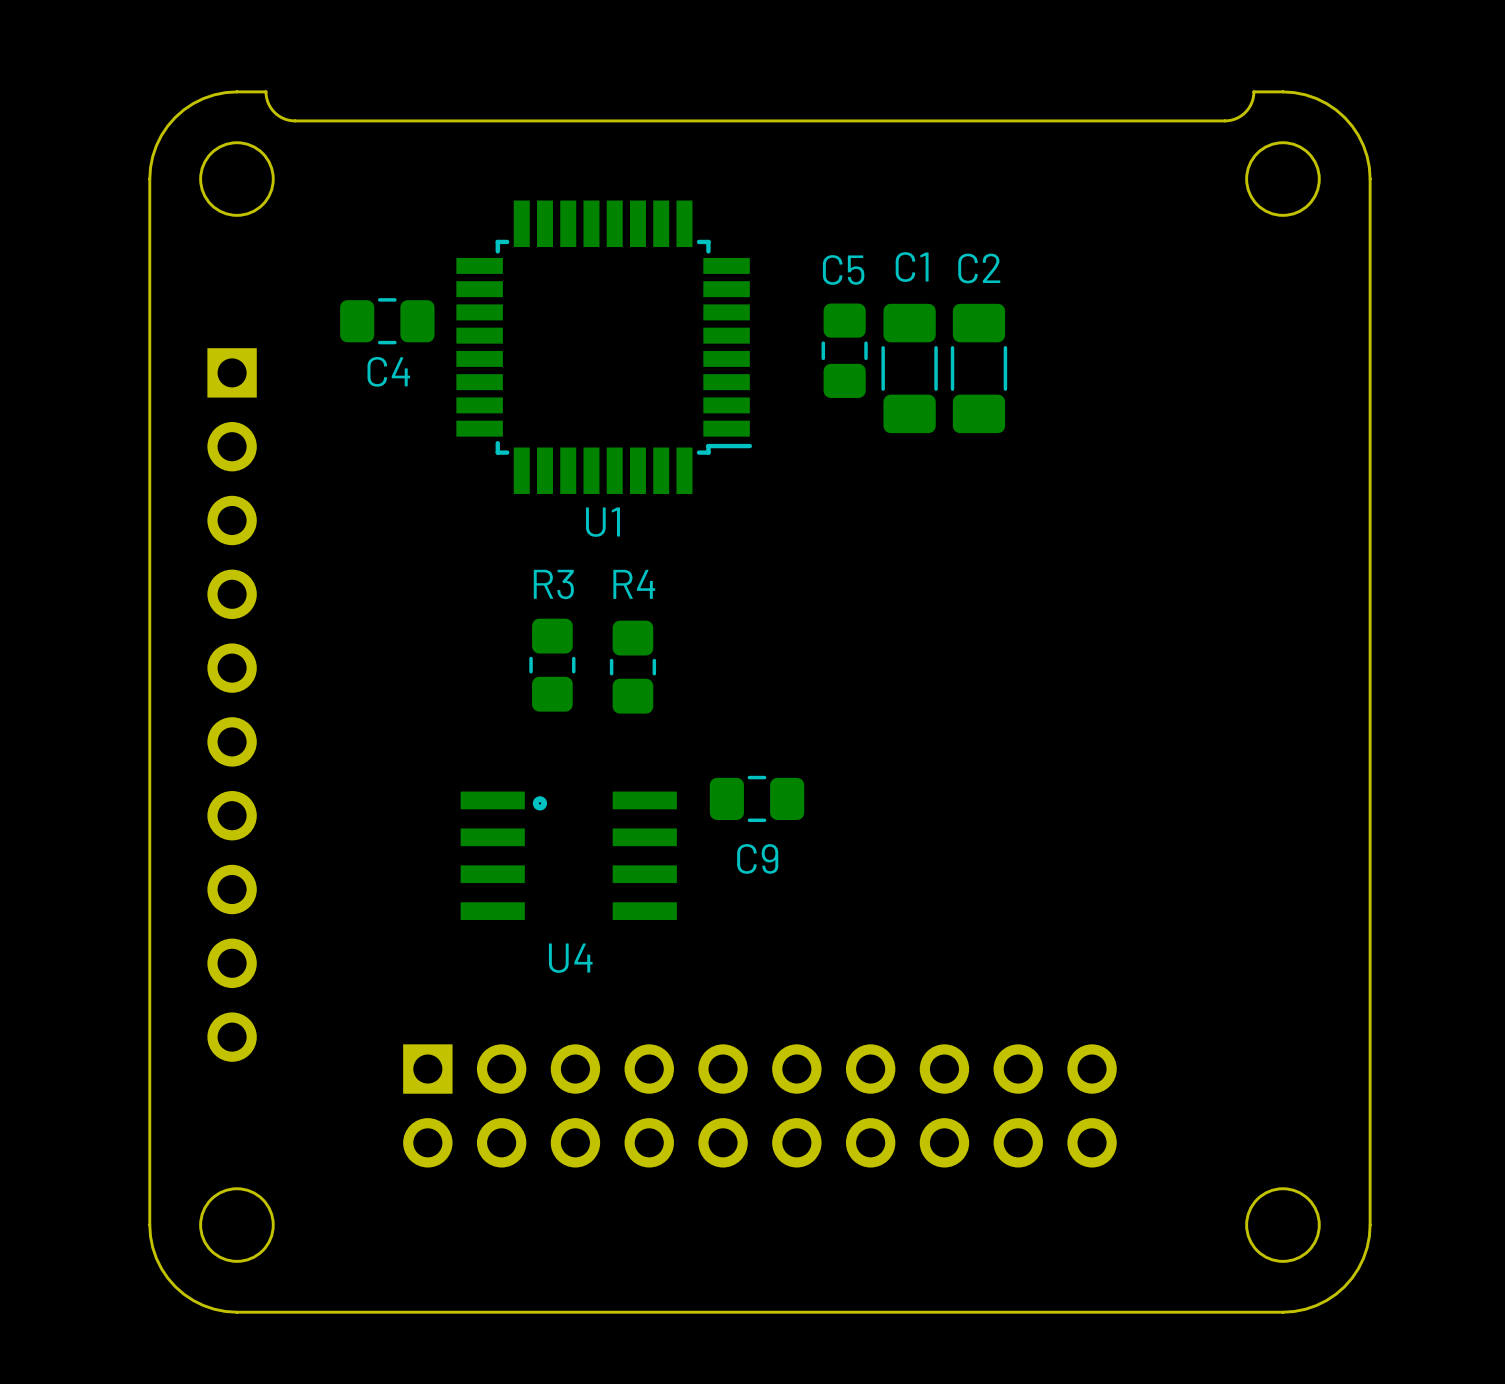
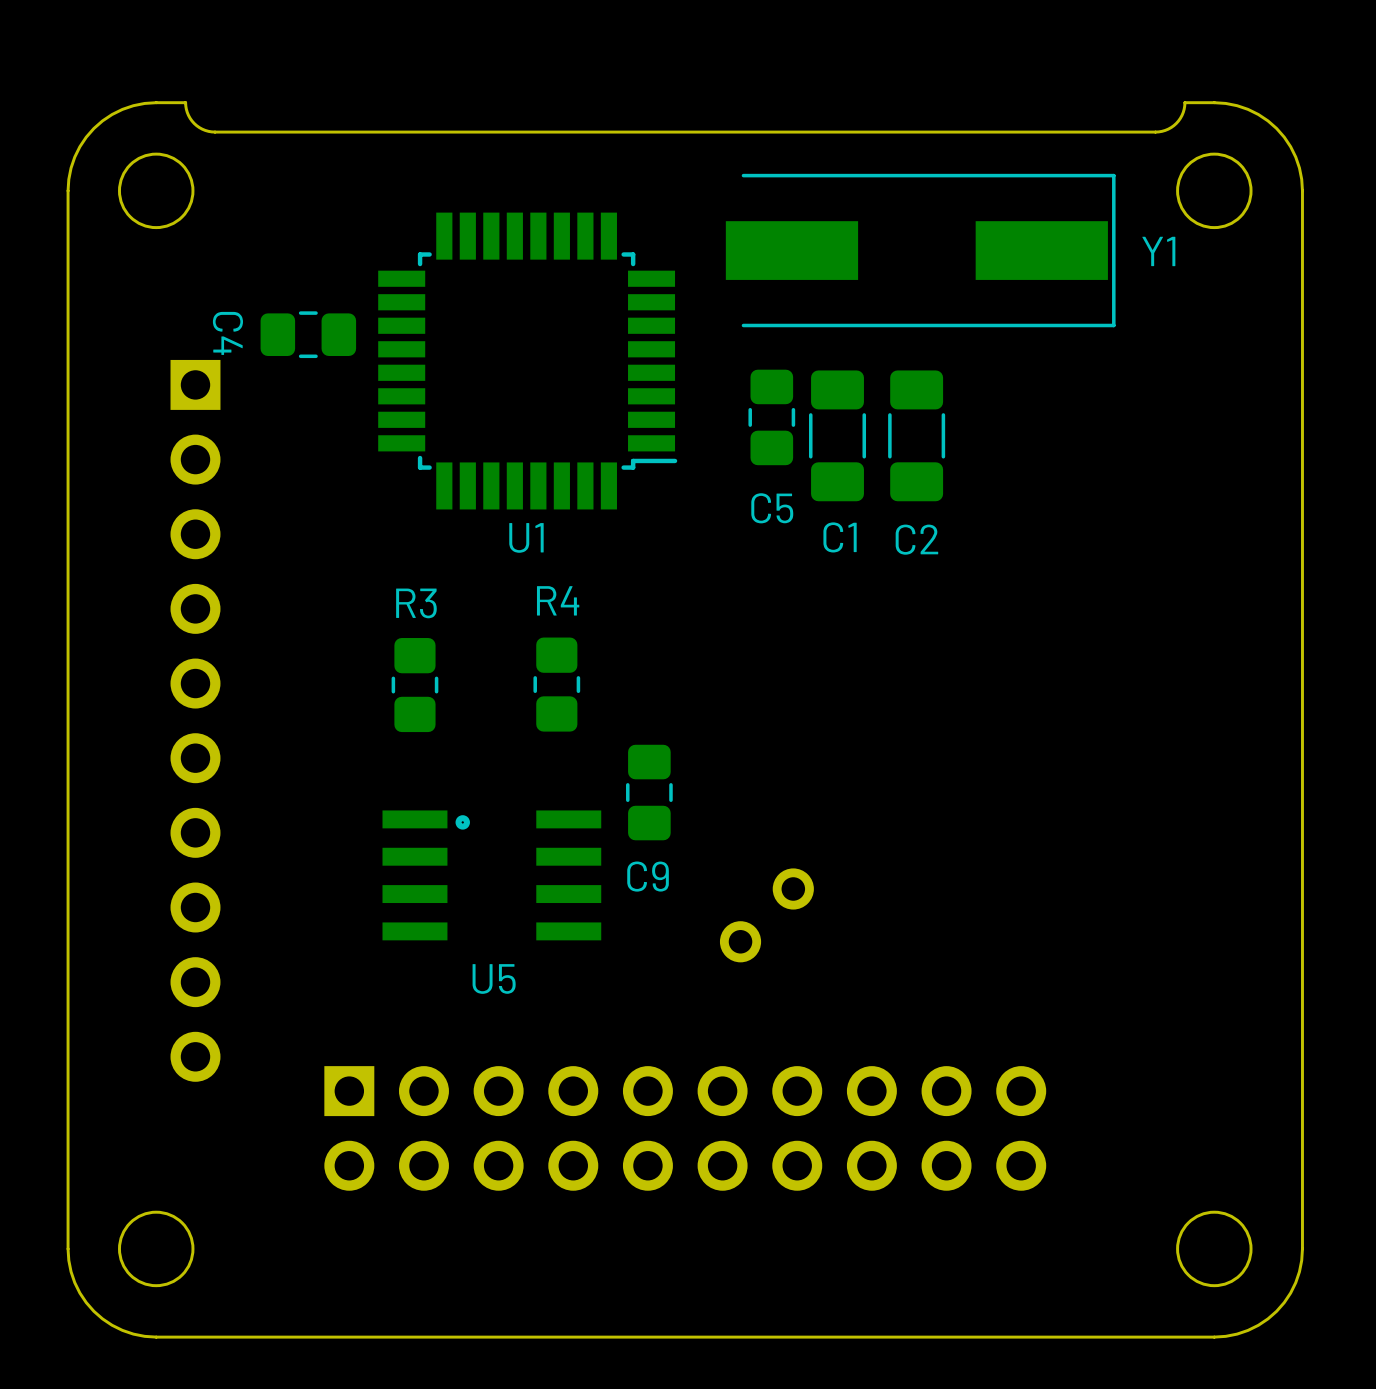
Y1: none -> (920, 250)
C1 name position: C1 (912, 267) -> C1 (840, 537)
C2 name position: C2 (979, 268) -> C2 (916, 539)
C5 name position: C5 (843, 269) -> C5 (772, 508)
C5 position: (844, 350) -> (771, 417)
C1 position: (909, 368) -> (837, 435)
C2 position: (978, 368) -> (916, 435)
C4 name rotation: 0° (388, 371) -> 90° clockwise (227, 333)
C4 name position: C4 (388, 371) -> C4 (227, 333)
R3 position: (552, 665) -> (414, 685)
part position: (232, 705) -> (195, 720)
C9 rotation: 0° (757, 798) -> 90° clockwise (649, 792)
part: none -> (766, 915)
U4 name: U4 (570, 958) -> U5 (494, 978)

